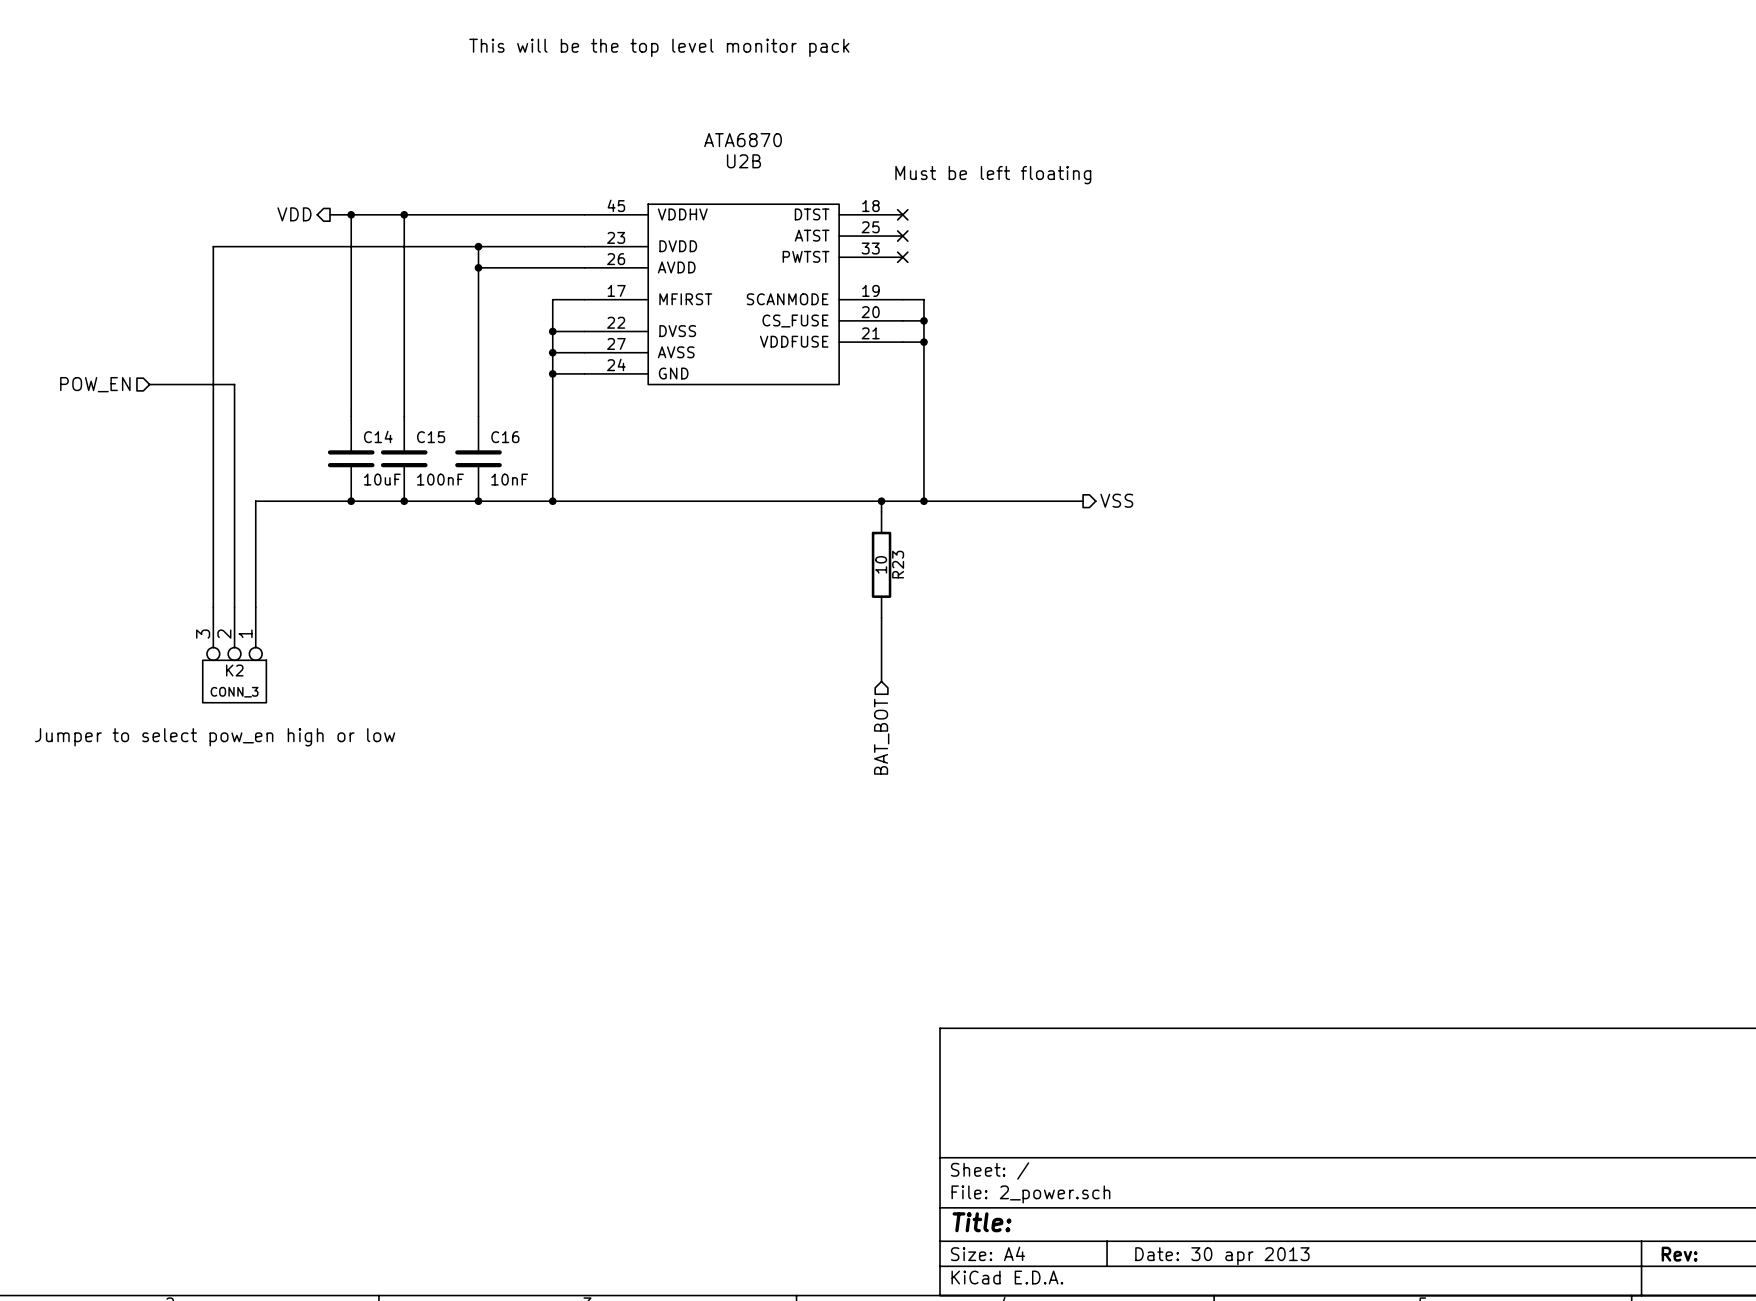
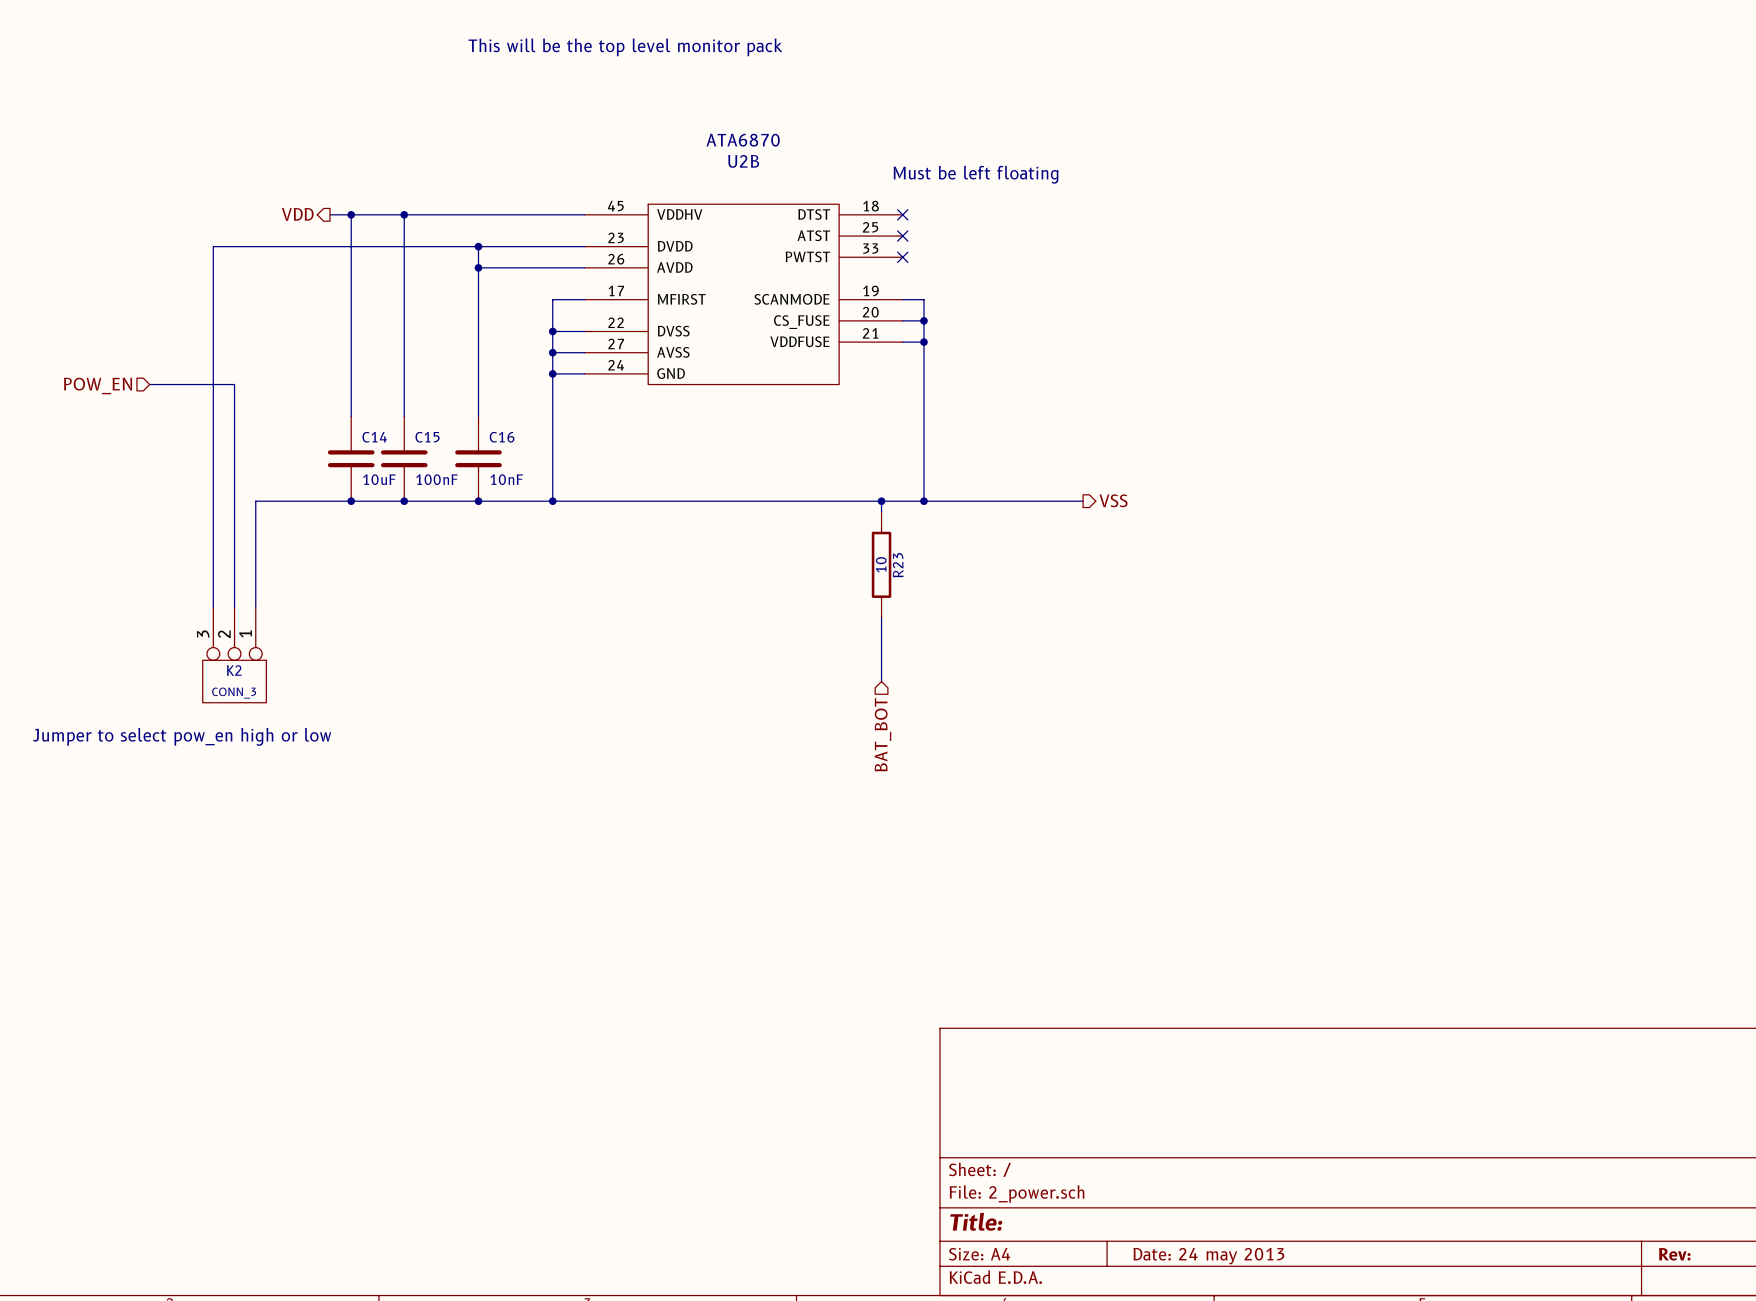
title block: Date: 30 apr 2013 (1222, 1256) -> Date: 24 may 2013 (1208, 1256)

